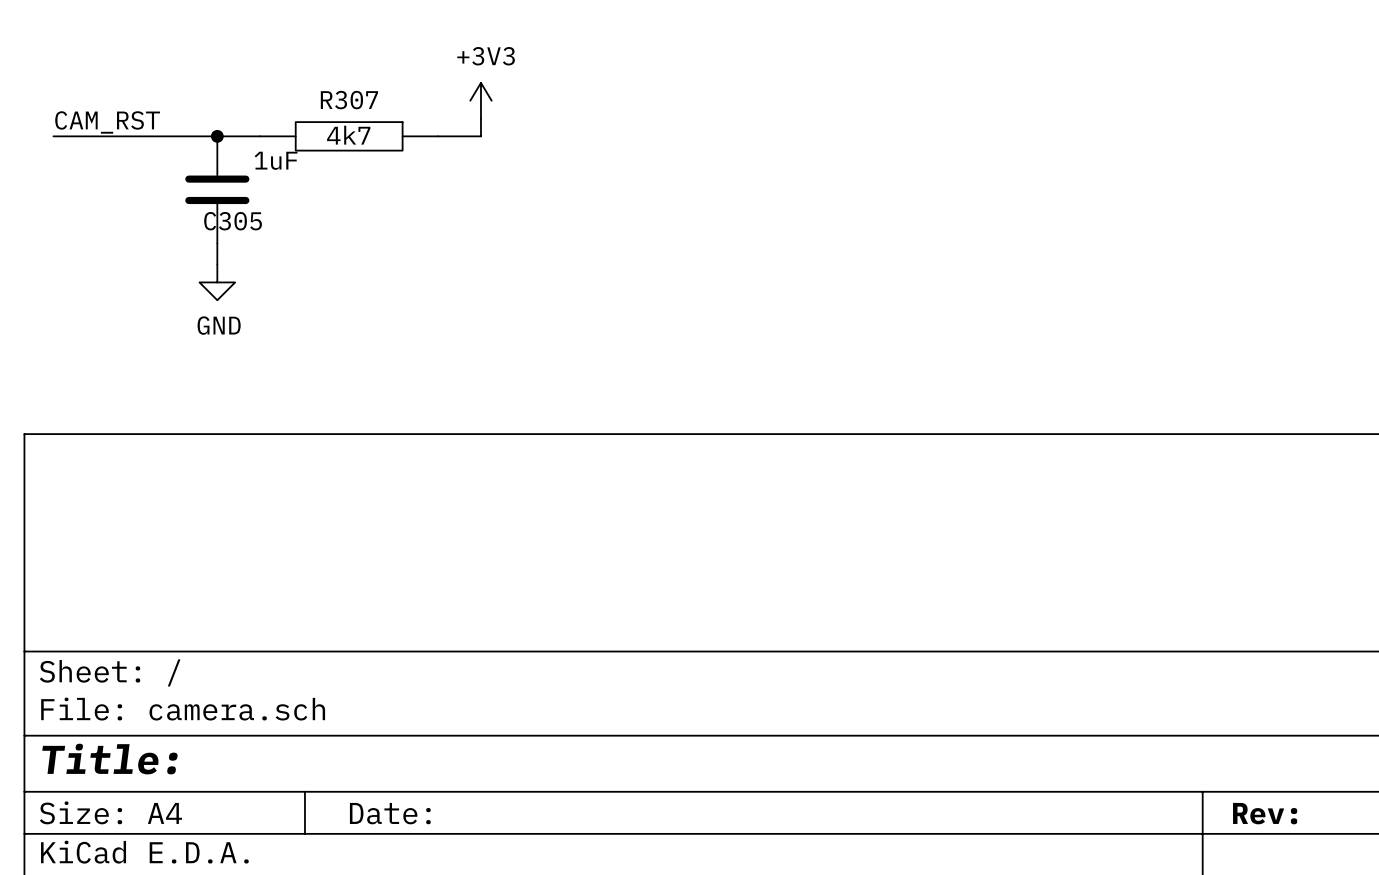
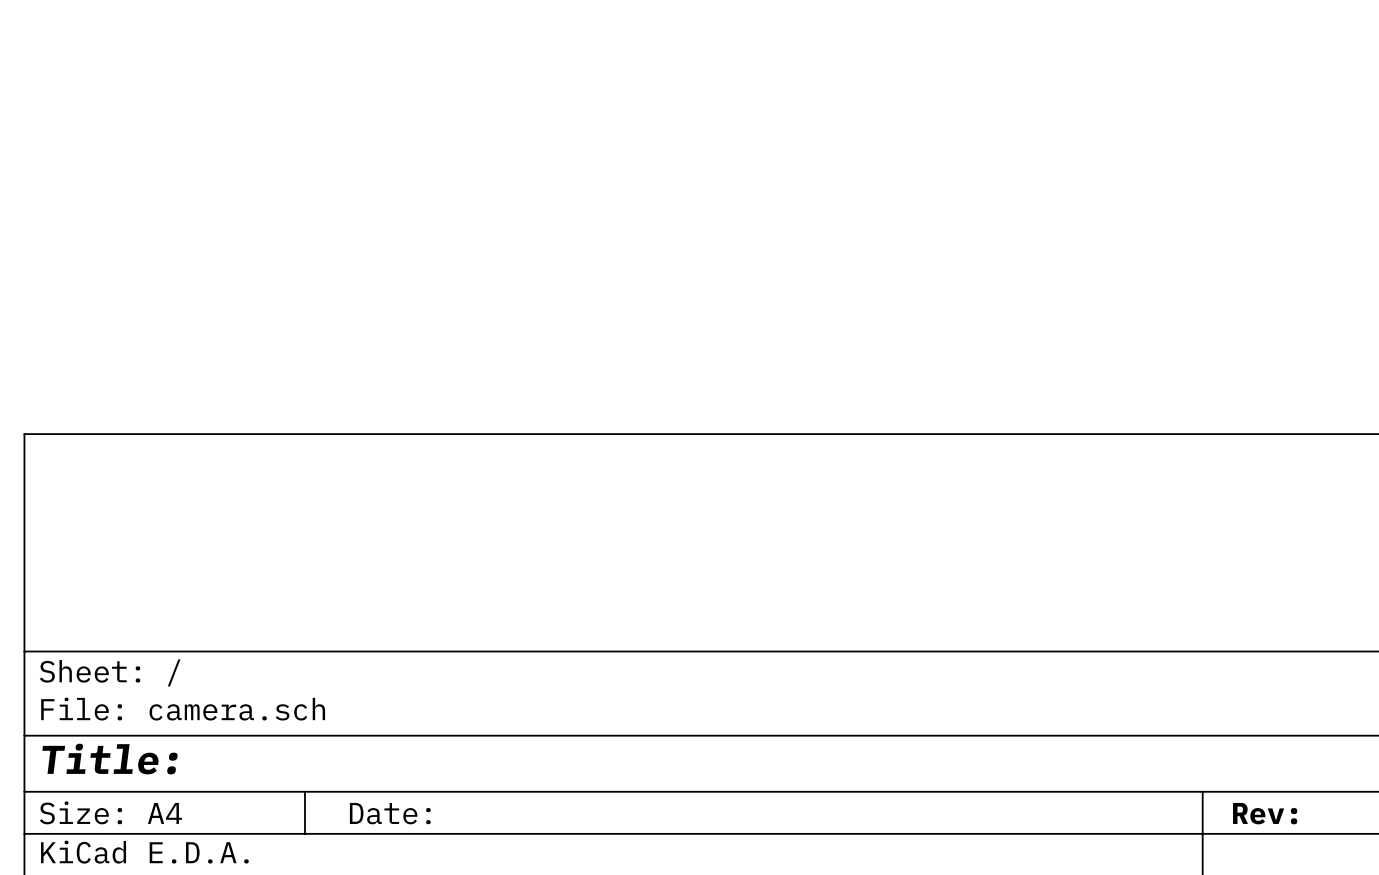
power symbol: +3V3 (480, 100) -> none
wire: (480, 118) (480, 136) (438, 136) -> none
label: CAM_RST (107, 122) -> none
wire: (53, 136) (260, 136) -> none
junction: (217, 136) -> none
R307: 4k7 (349, 136) -> none
C305: 1uF (217, 189) -> none
wire: (217, 243) (217, 264) -> none
power symbol: GND (217, 282) -> none

